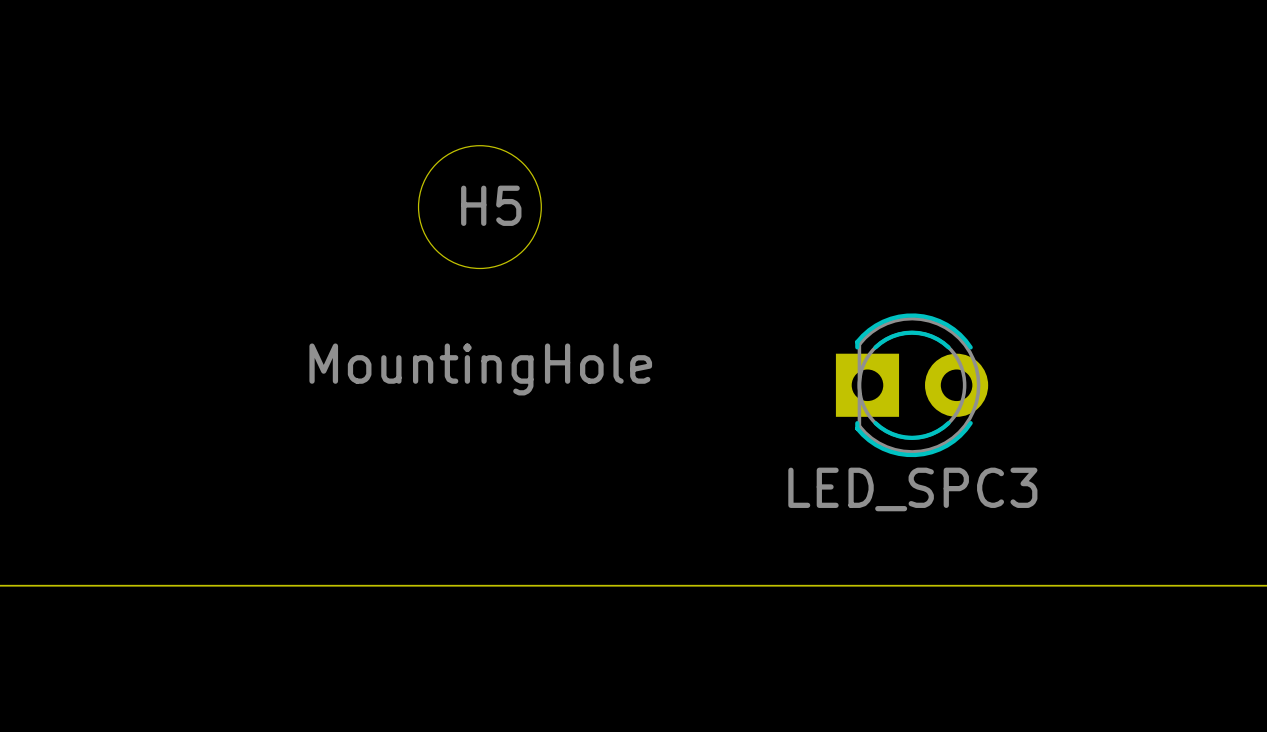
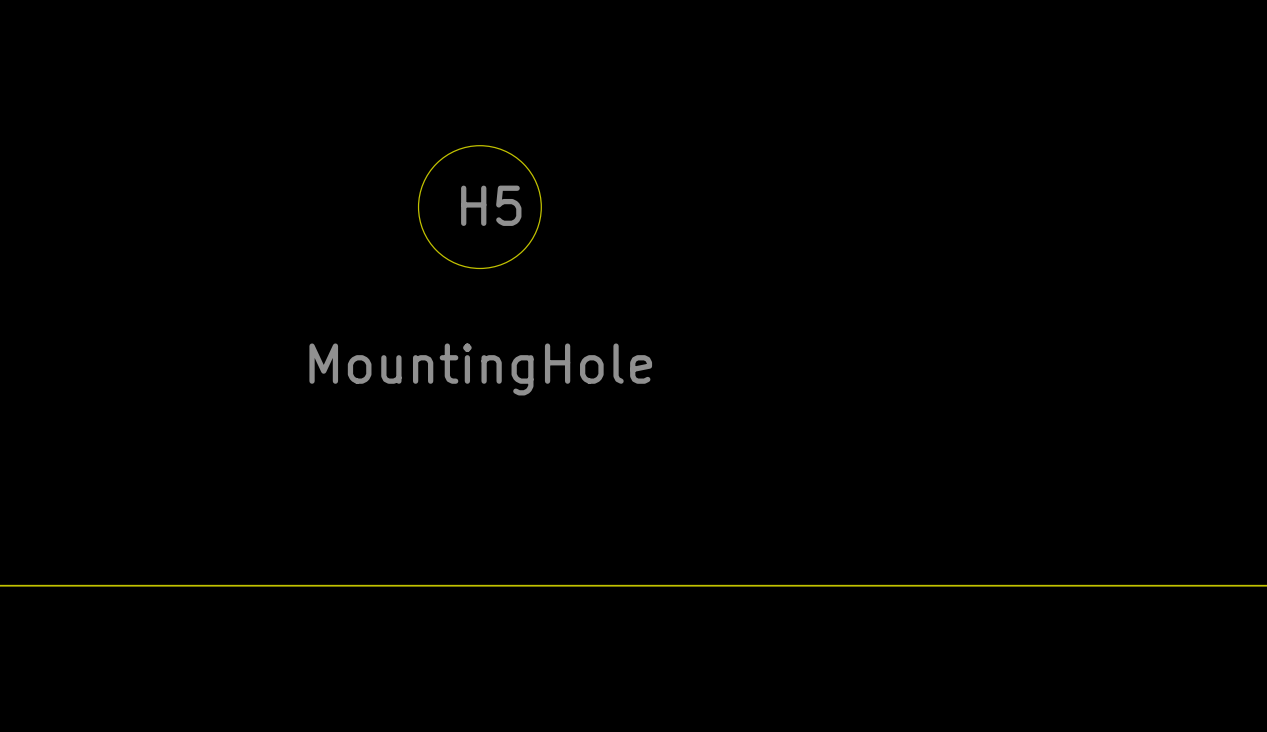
part: LED_SPC3 (912, 385) -> none

